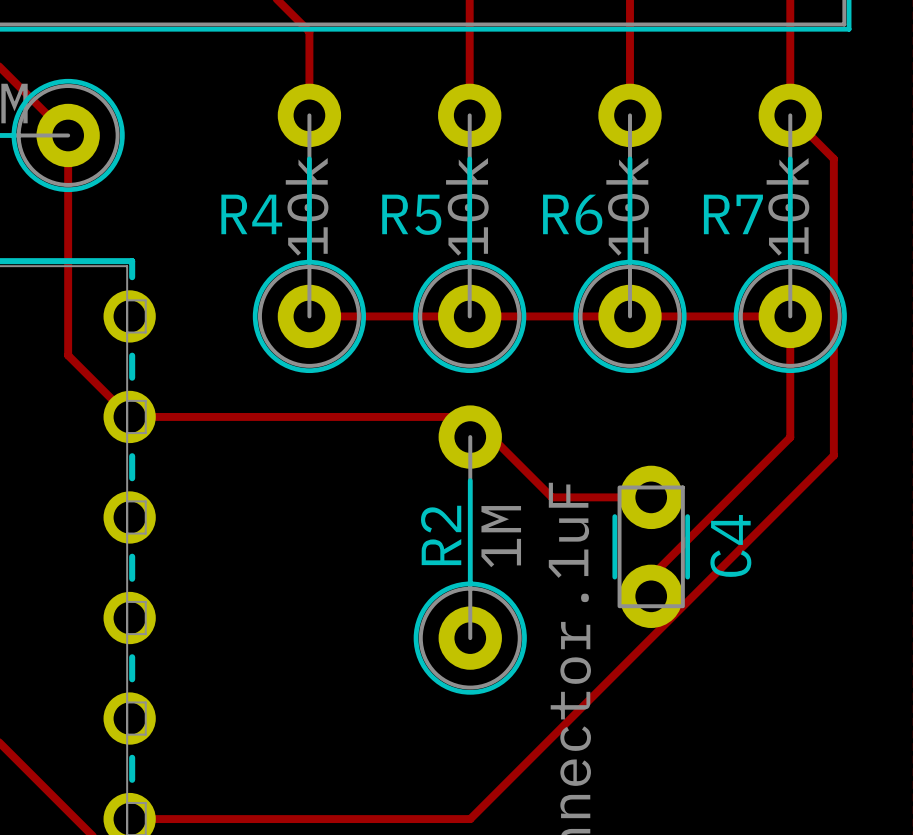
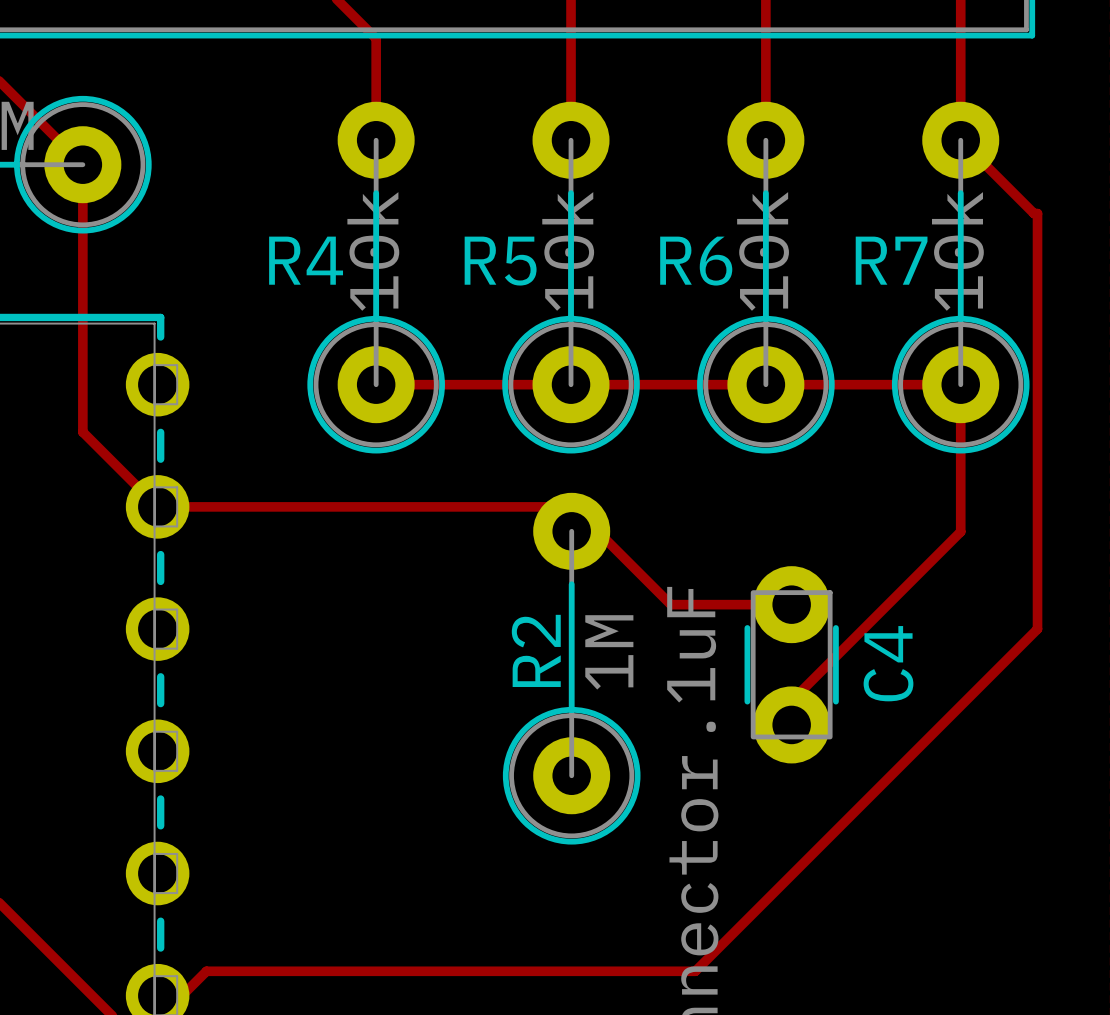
track: (833, 158) (833, 455) (470, 819) (149, 819) -> (1013, 193) (1034, 213) (1037, 213) (1037, 629) (695, 971) (206, 971) (182, 995)

